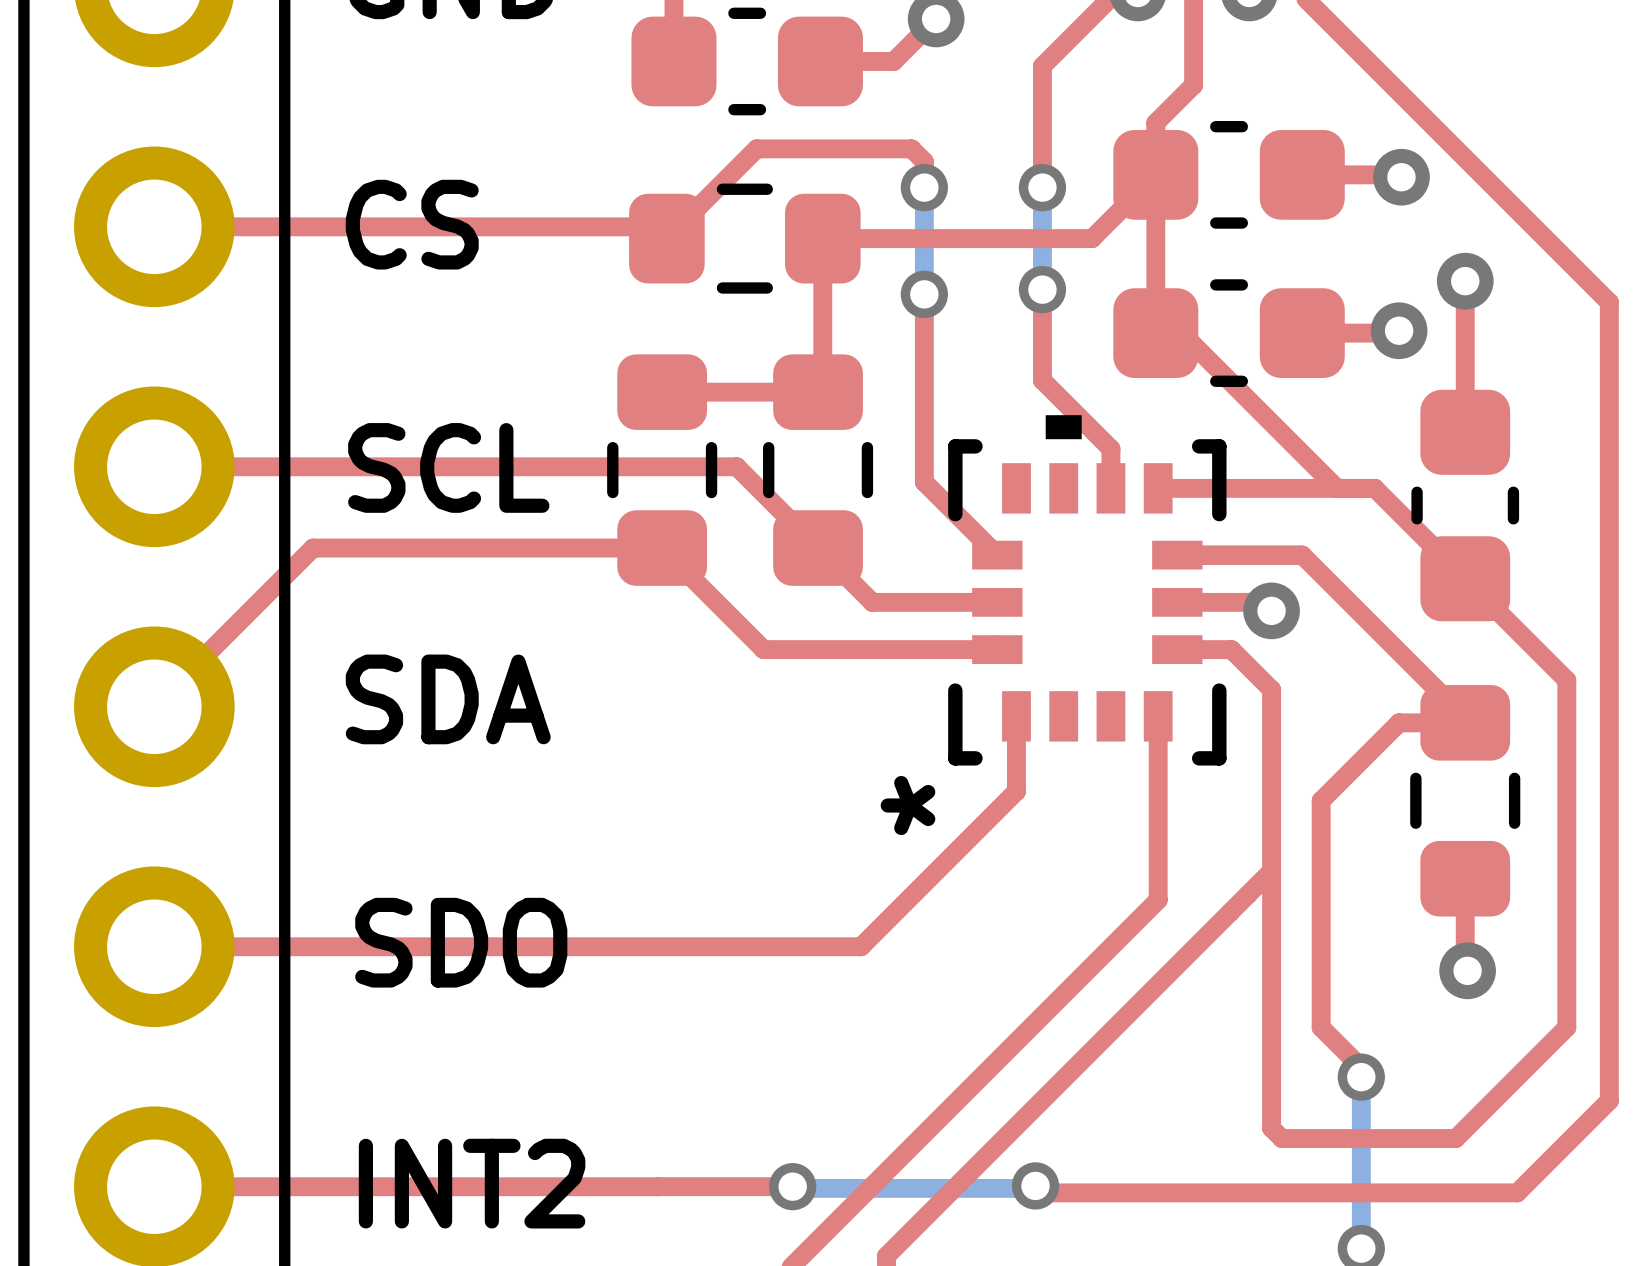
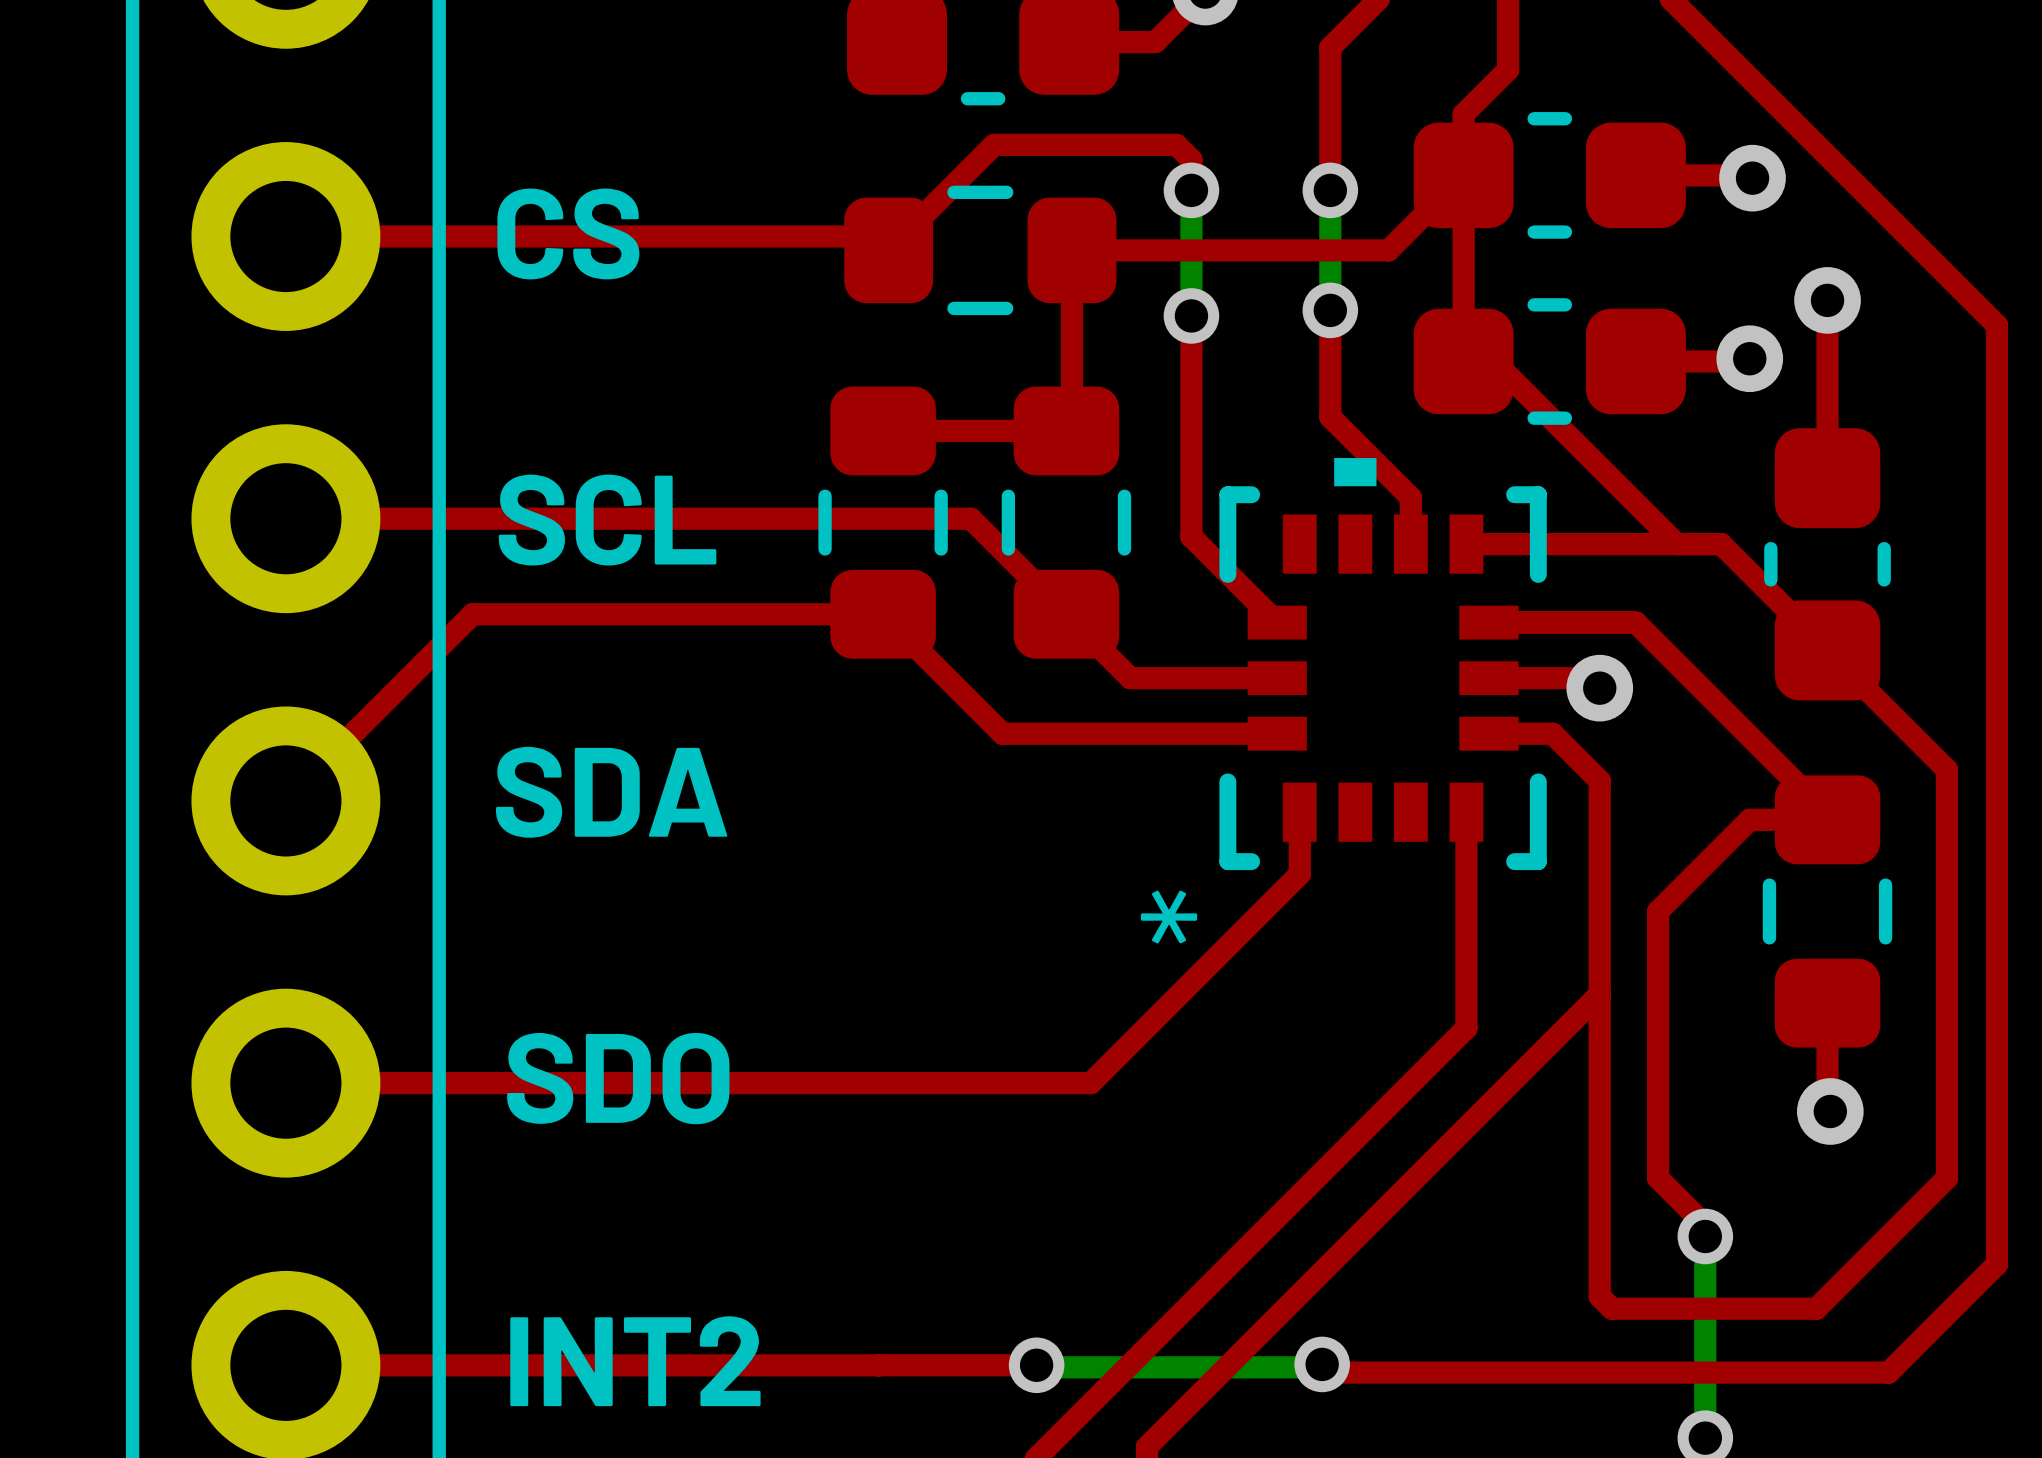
top track: (1016, 769) (1016, 791) (861, 946) (838, 946) -> (1299, 874) (1090, 1083)

